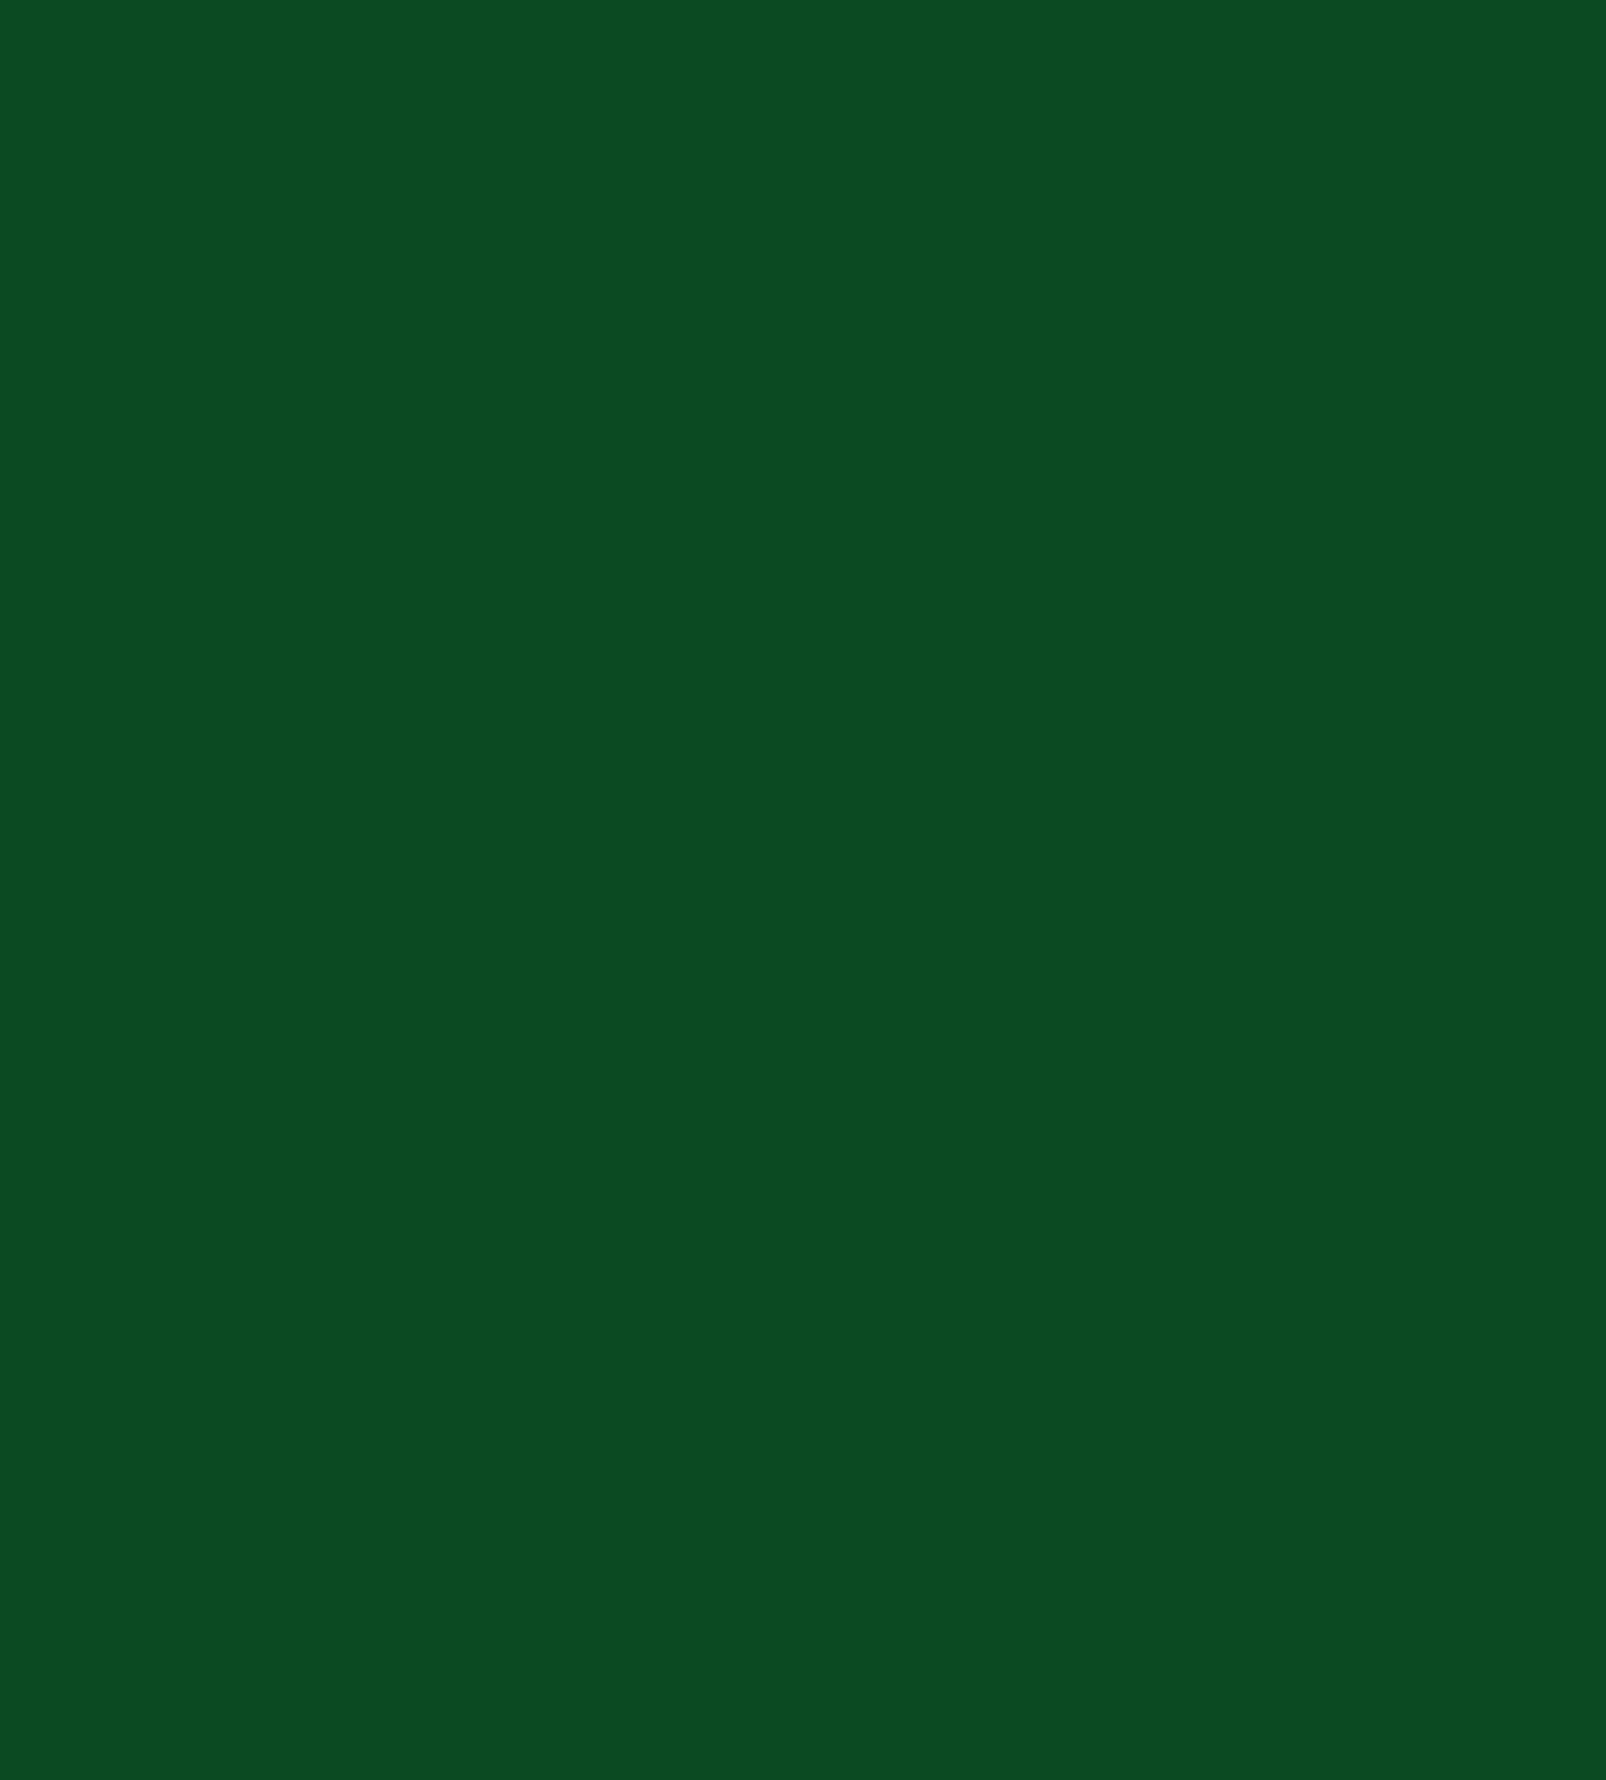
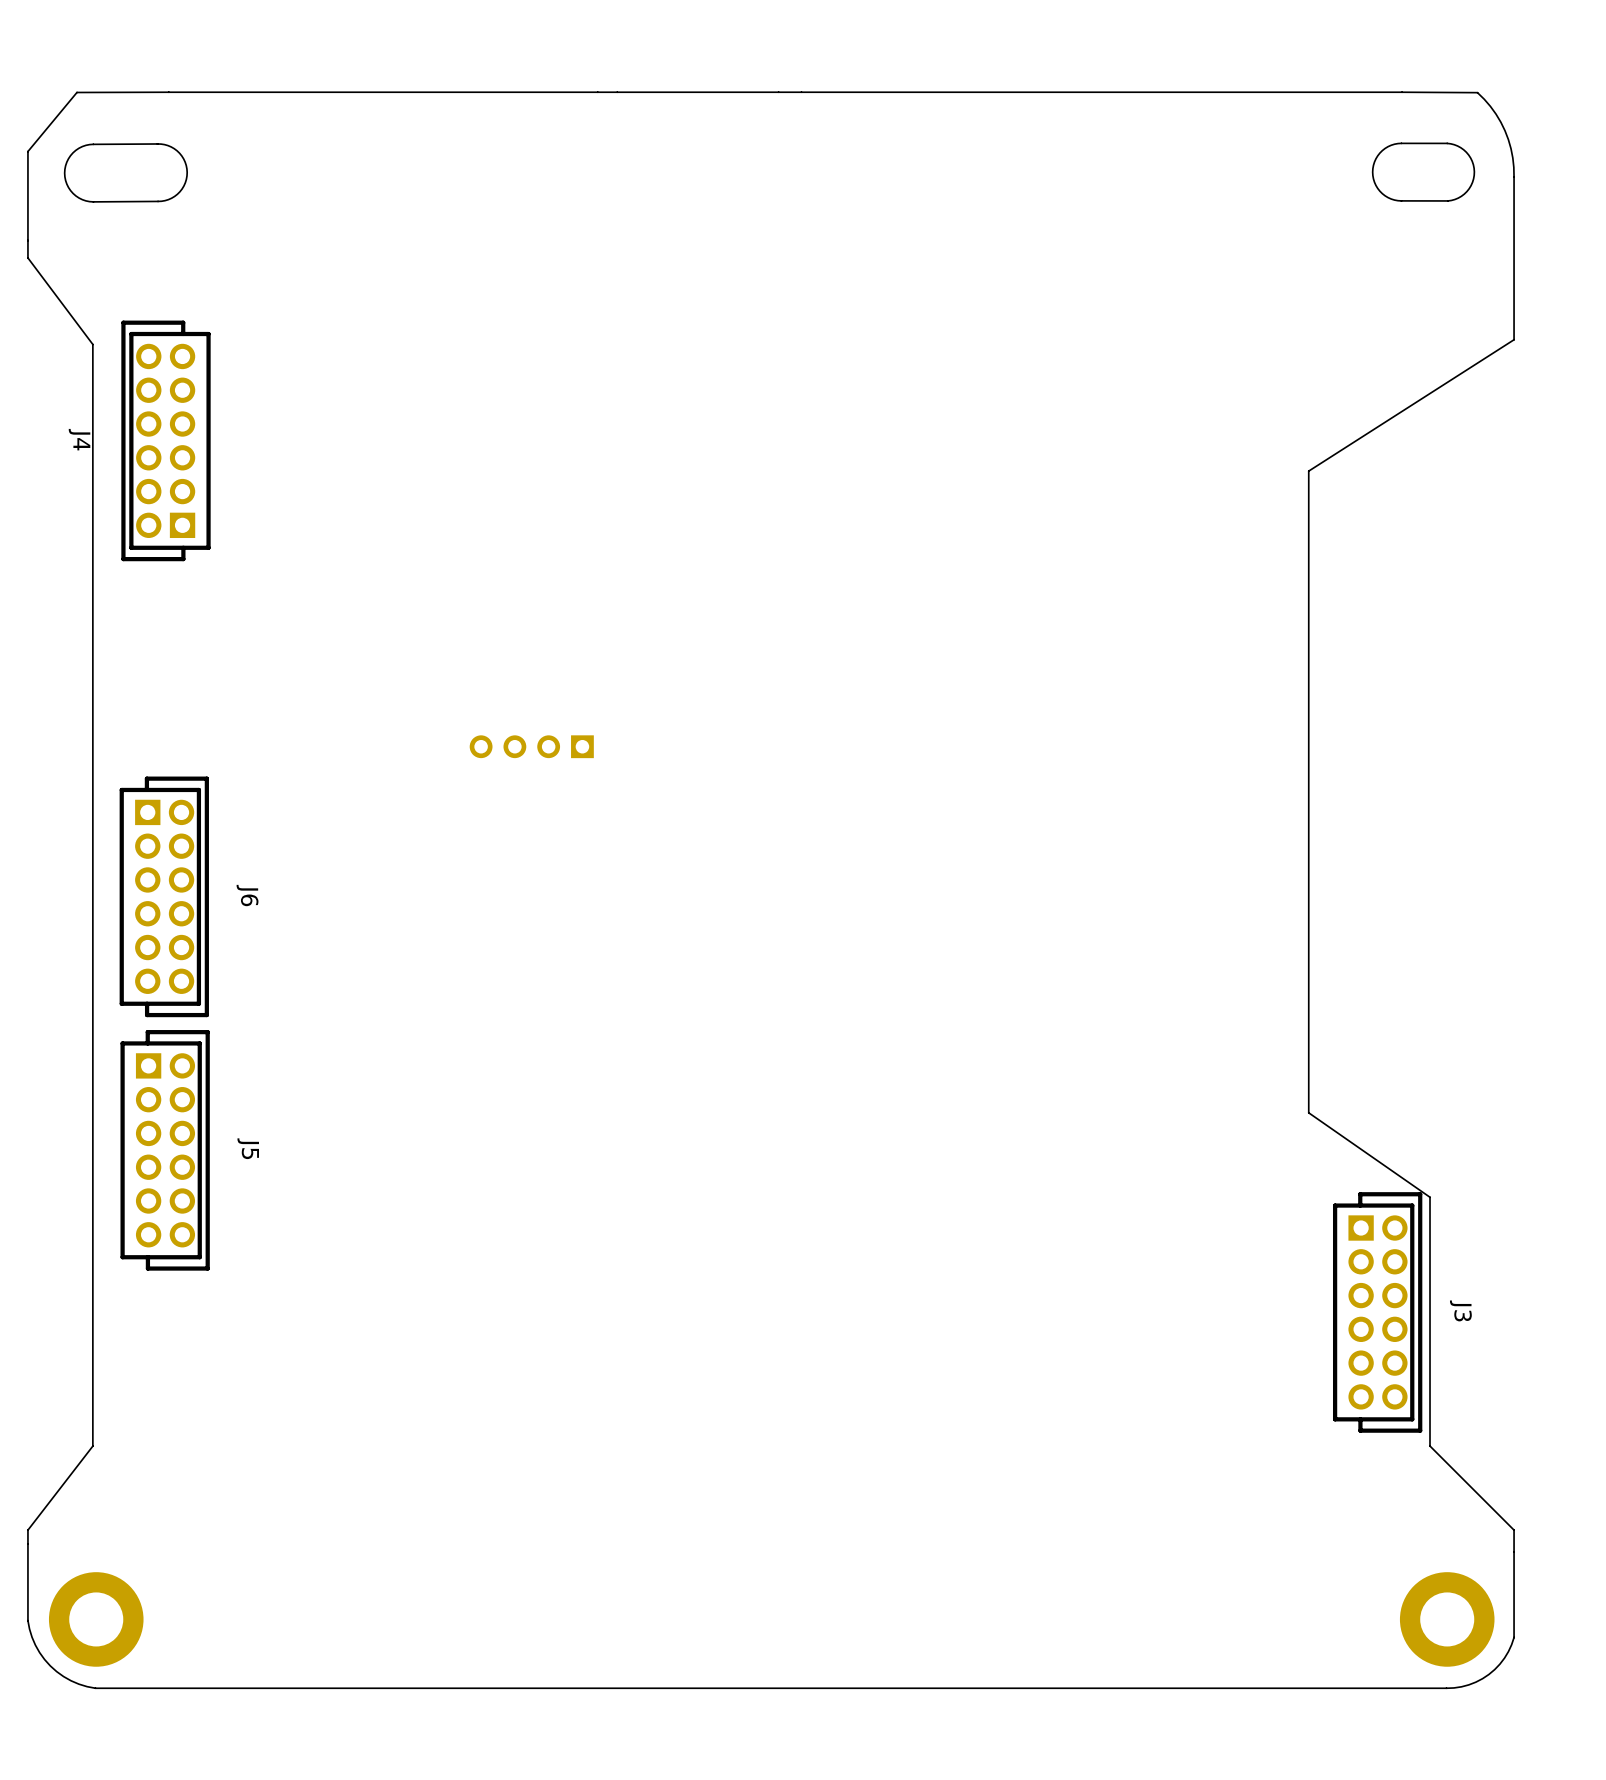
board edge: none -> (1402, 92) (76, 92) (27, 151) (27, 258) (92, 344) (92, 1446) (27, 1530) (29, 1629) (39, 1652) (56, 1671) (78, 1684) (95, 1688) (1446, 1688) (1461, 1686) (1475, 1682) (1488, 1674) (1499, 1664) (1508, 1651) (1514, 1637) (1514, 1530) (1429, 1446) (1429, 1197) (1308, 1112) (1308, 471) (1514, 339) (1513, 167) (1511, 148) (1505, 130) (1496, 114) (1477, 92) (1402, 92)
board edge: none -> (157, 143) (93, 144) (82, 146) (73, 152) (66, 162) (64, 173) (66, 184) (75, 195) (89, 201) (158, 201) (171, 198) (179, 191) (185, 182) (186, 165) (181, 155) (174, 148) (157, 143)
board edge: none -> (1447, 143) (1397, 143) (1385, 148) (1377, 155) (1372, 168) (1373, 179) (1377, 188) (1388, 197) (1397, 200) (1447, 200) (1461, 196) (1472, 182) (1473, 164) (1463, 149) (1447, 143)
J4: none -> (165, 440)
part: none -> (531, 746)
J6: none -> (164, 896)
J5: none -> (165, 1150)
J3: none -> (1377, 1312)
part: none -> (96, 1619)
part: none -> (1447, 1619)

